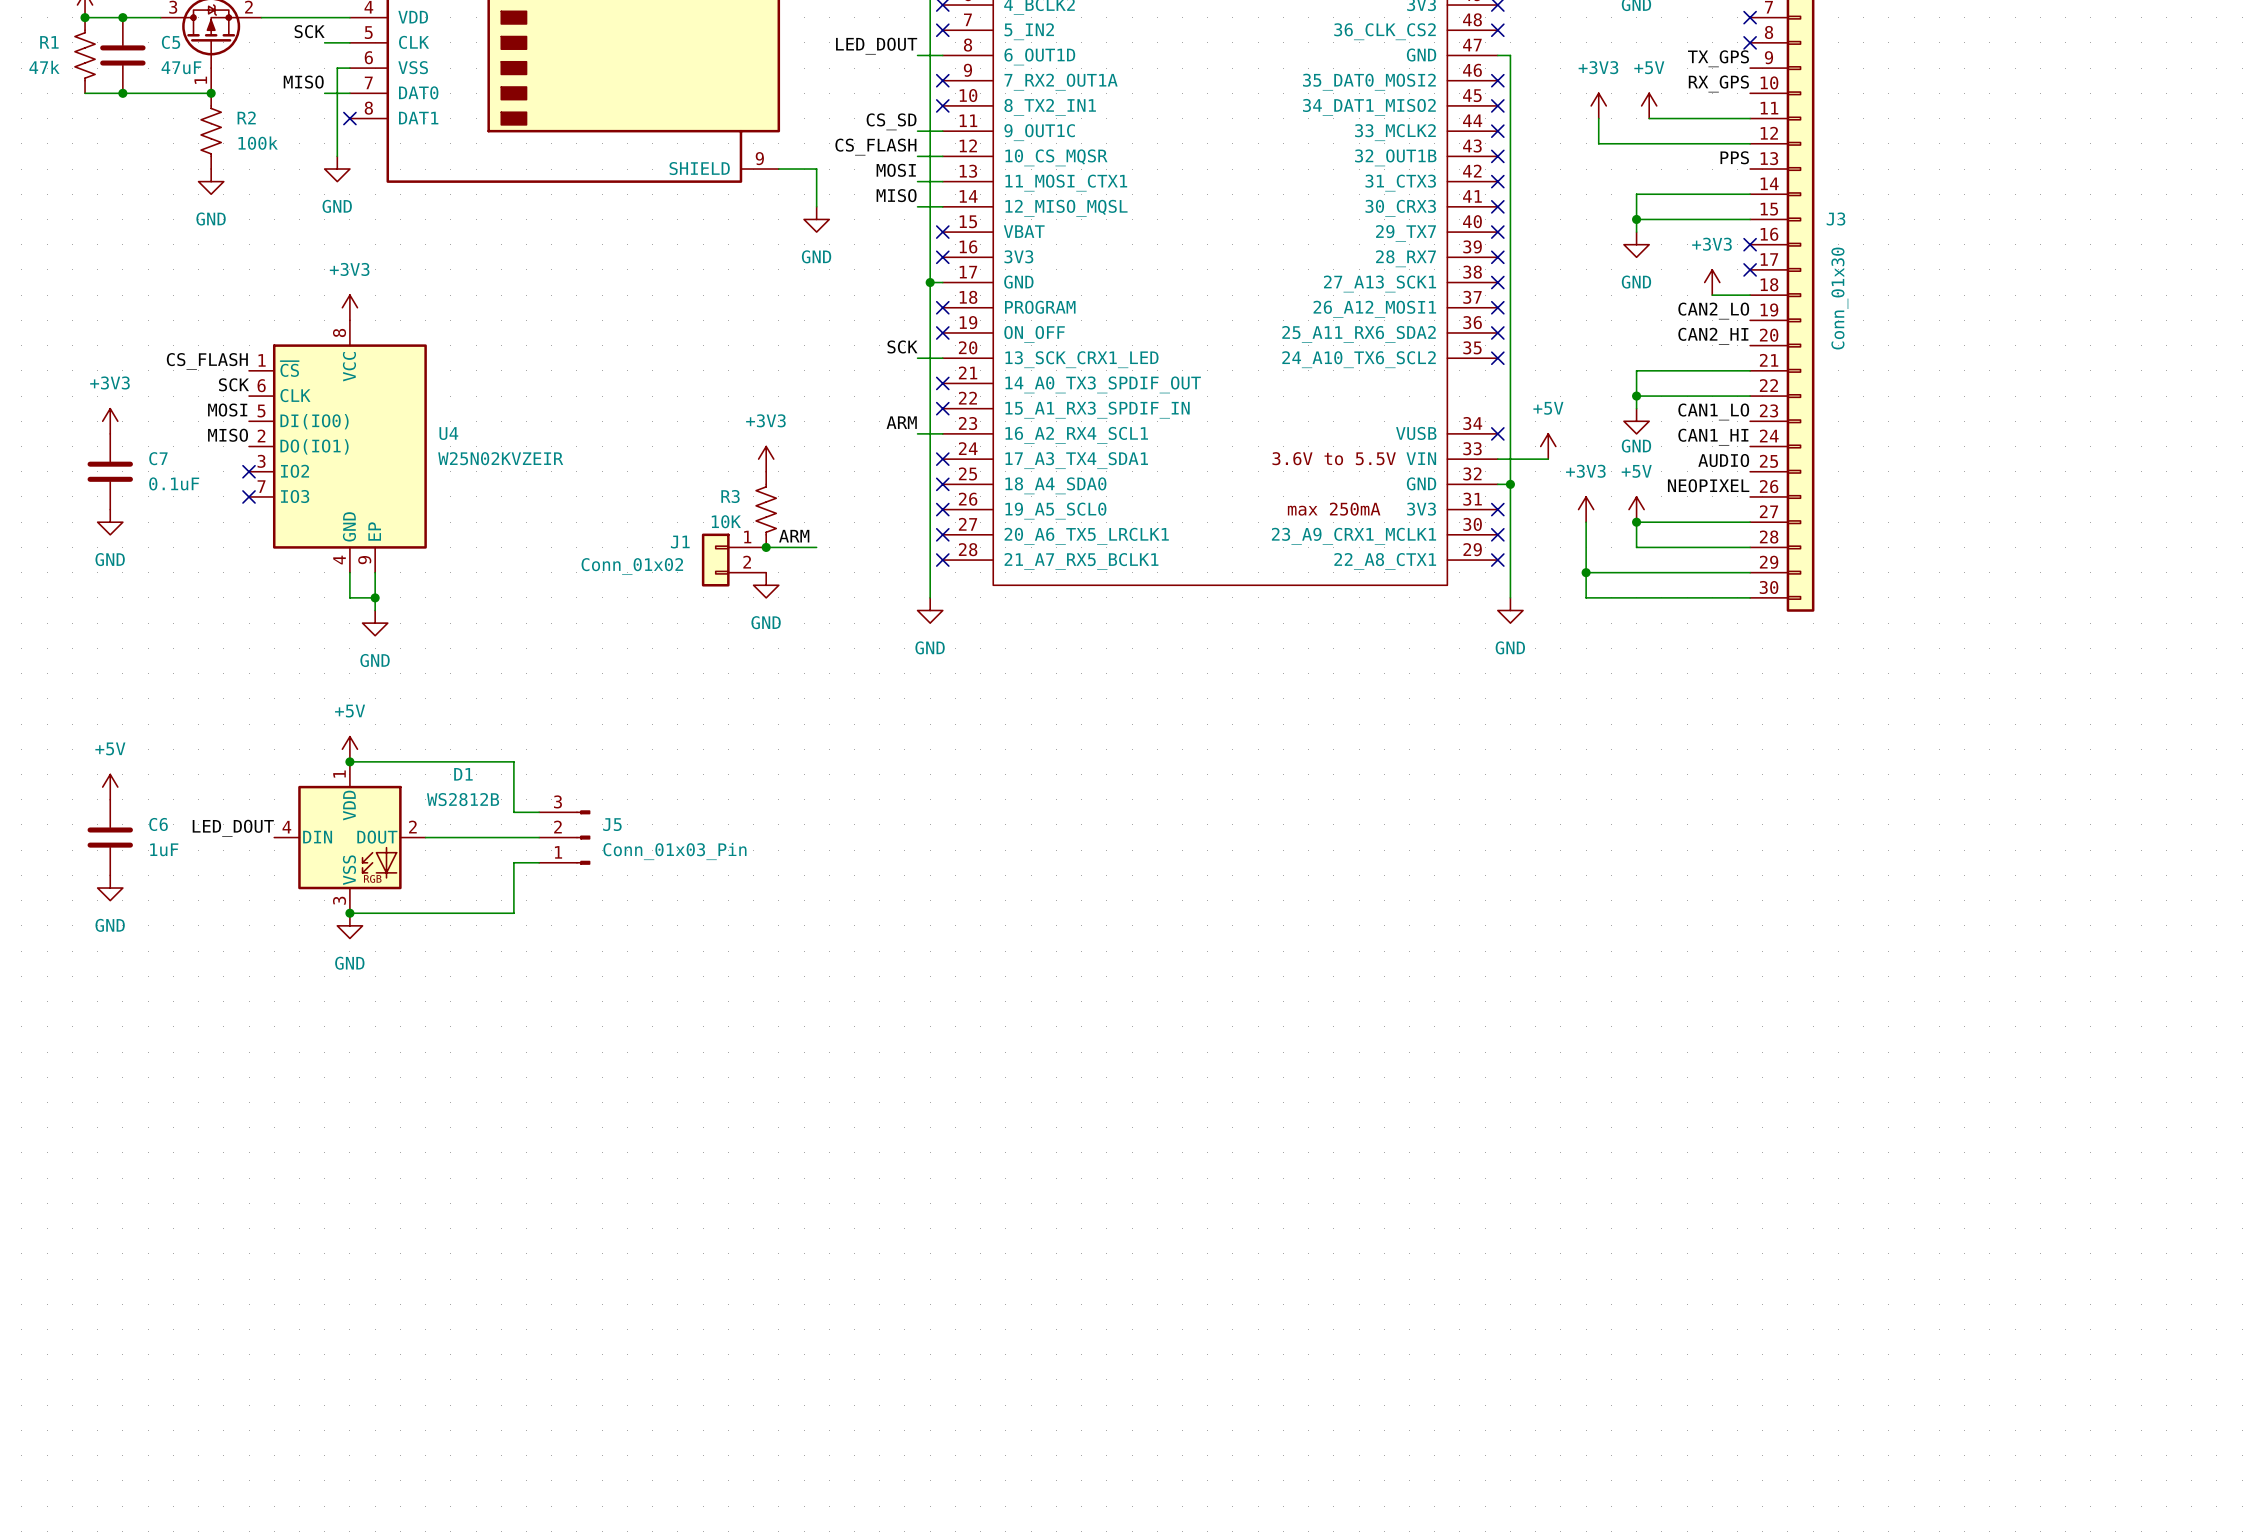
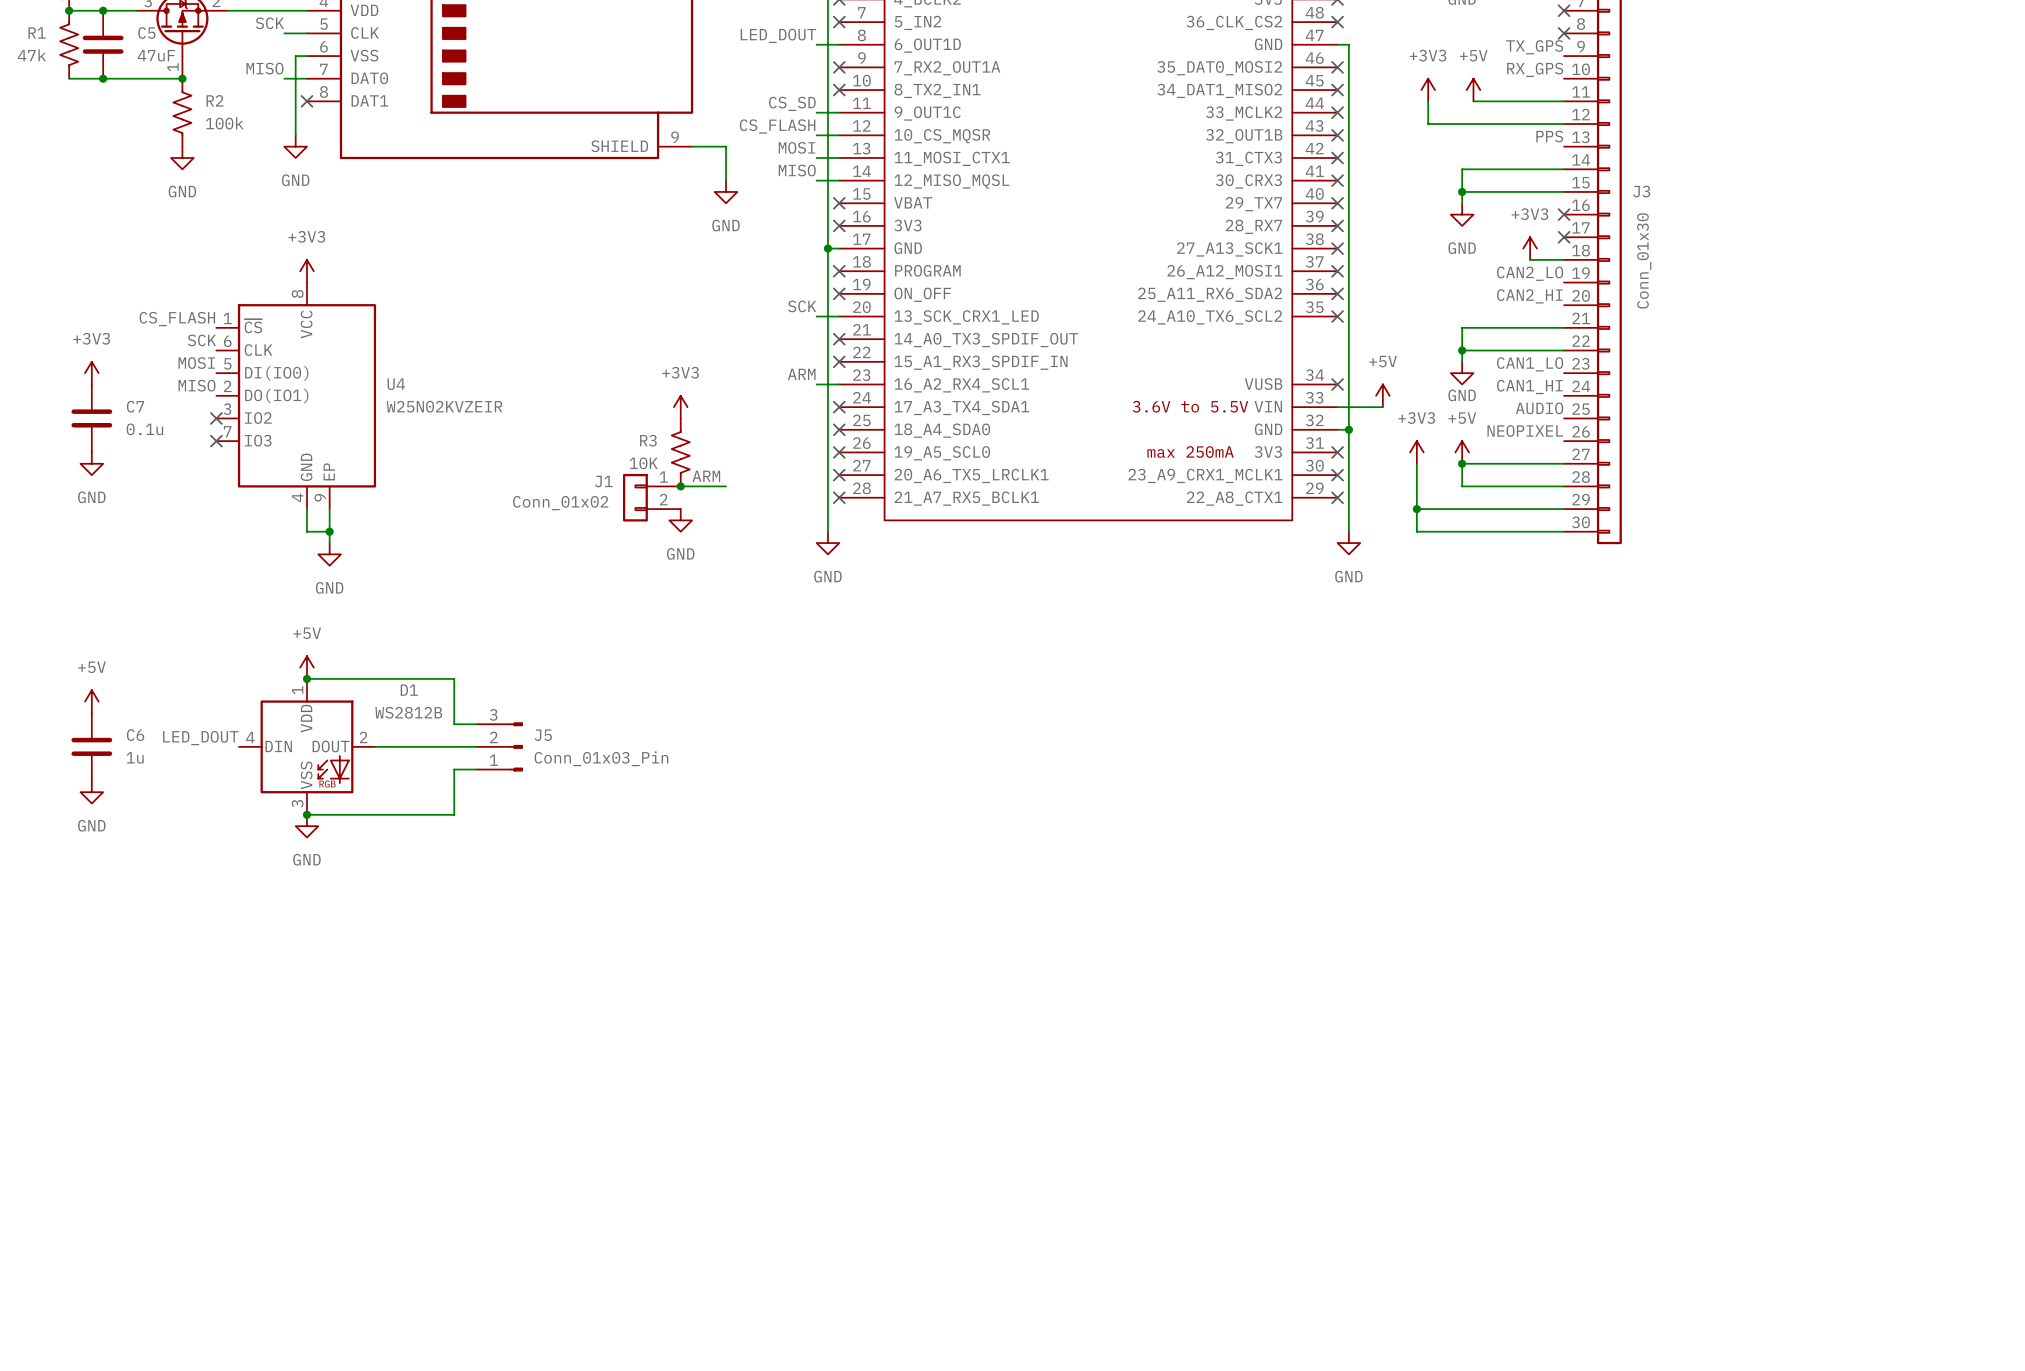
C7 value: 0.1uF (174, 483) -> 0.1u (144, 429)
C6 value: 1uF (164, 849) -> 1u (135, 757)

